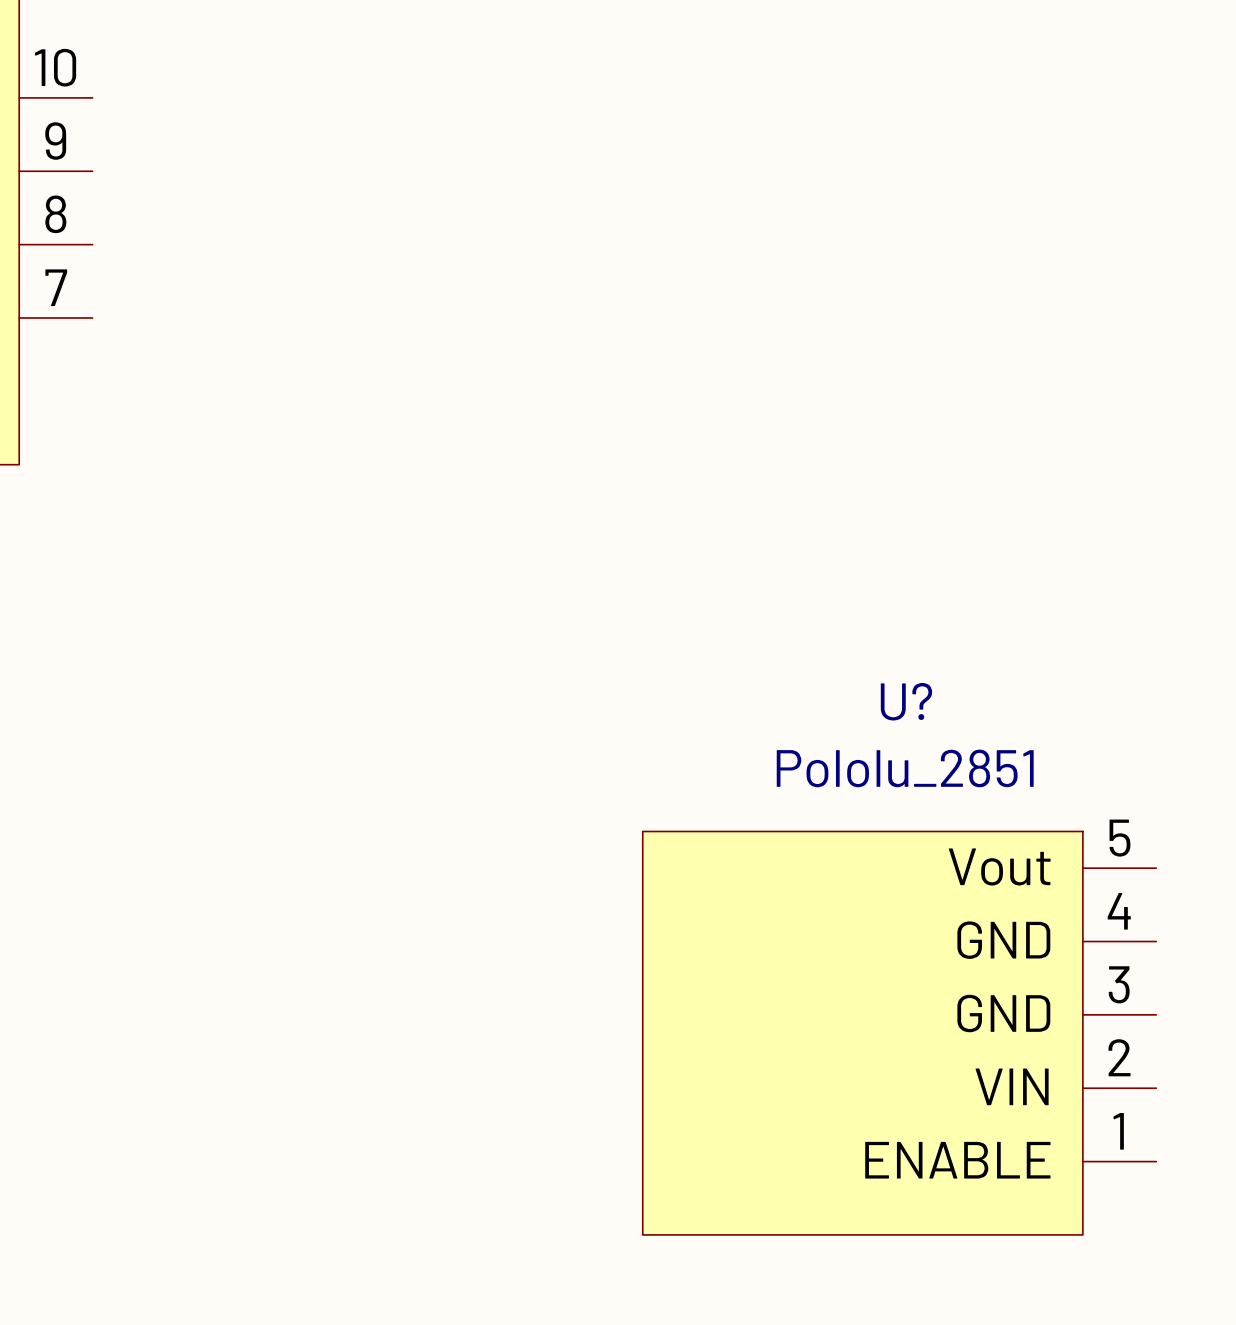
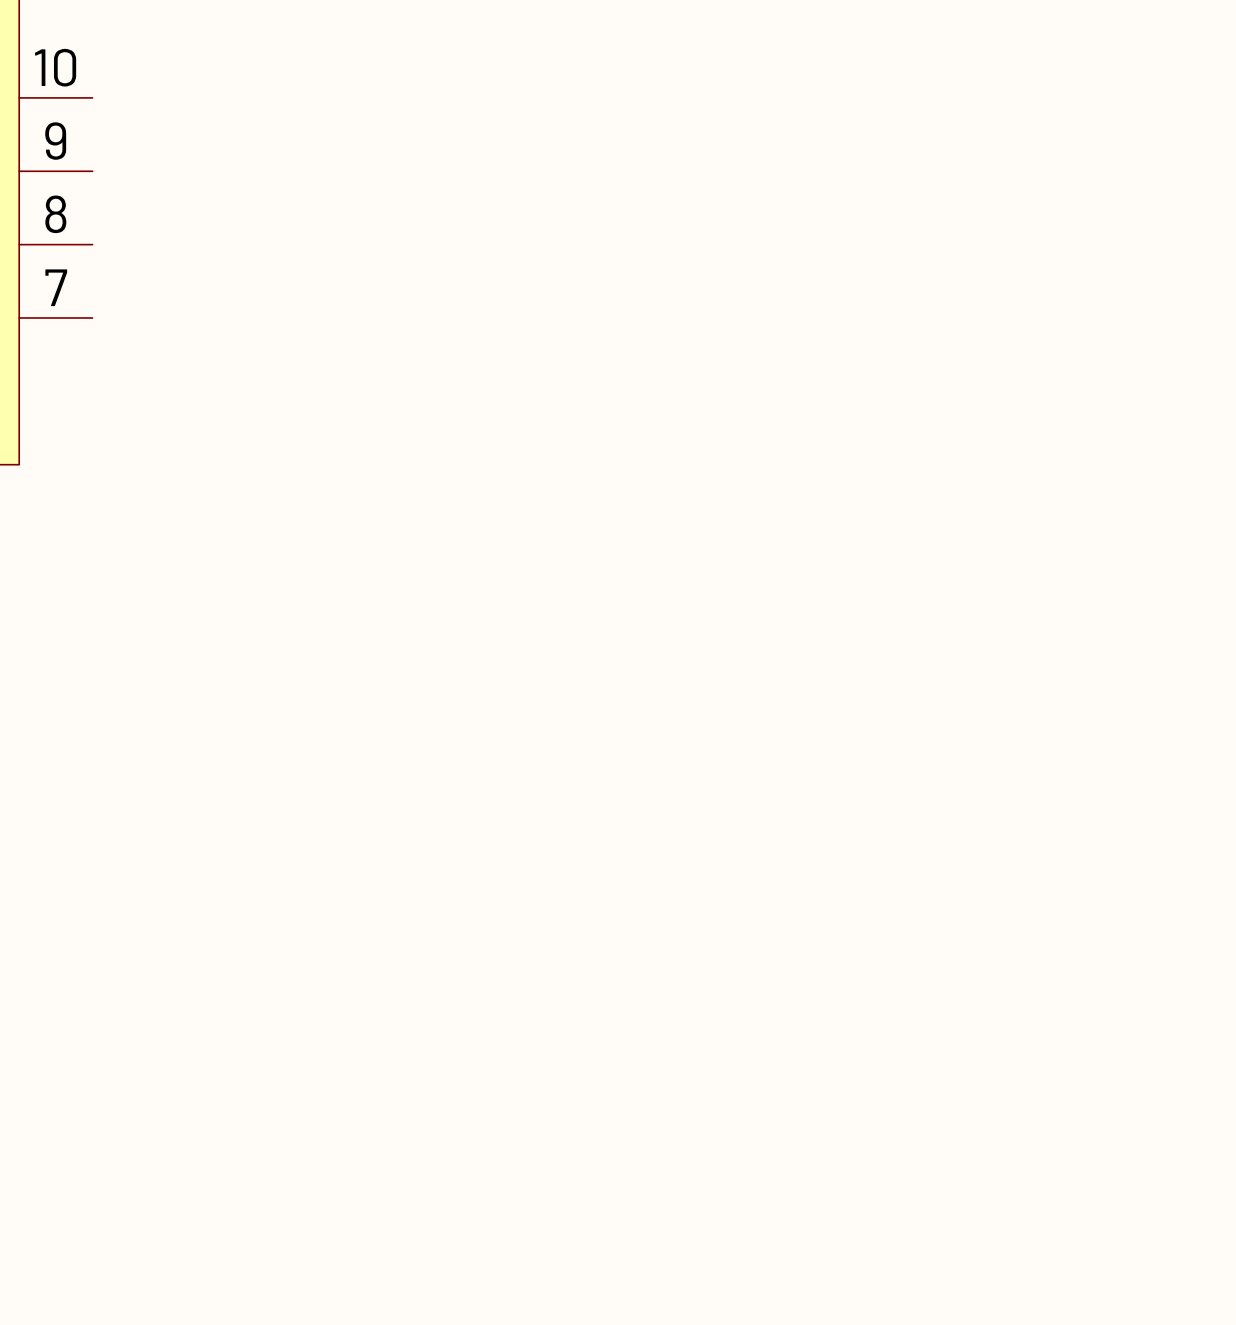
U?: Pololu_2851 (899, 1033) -> none

